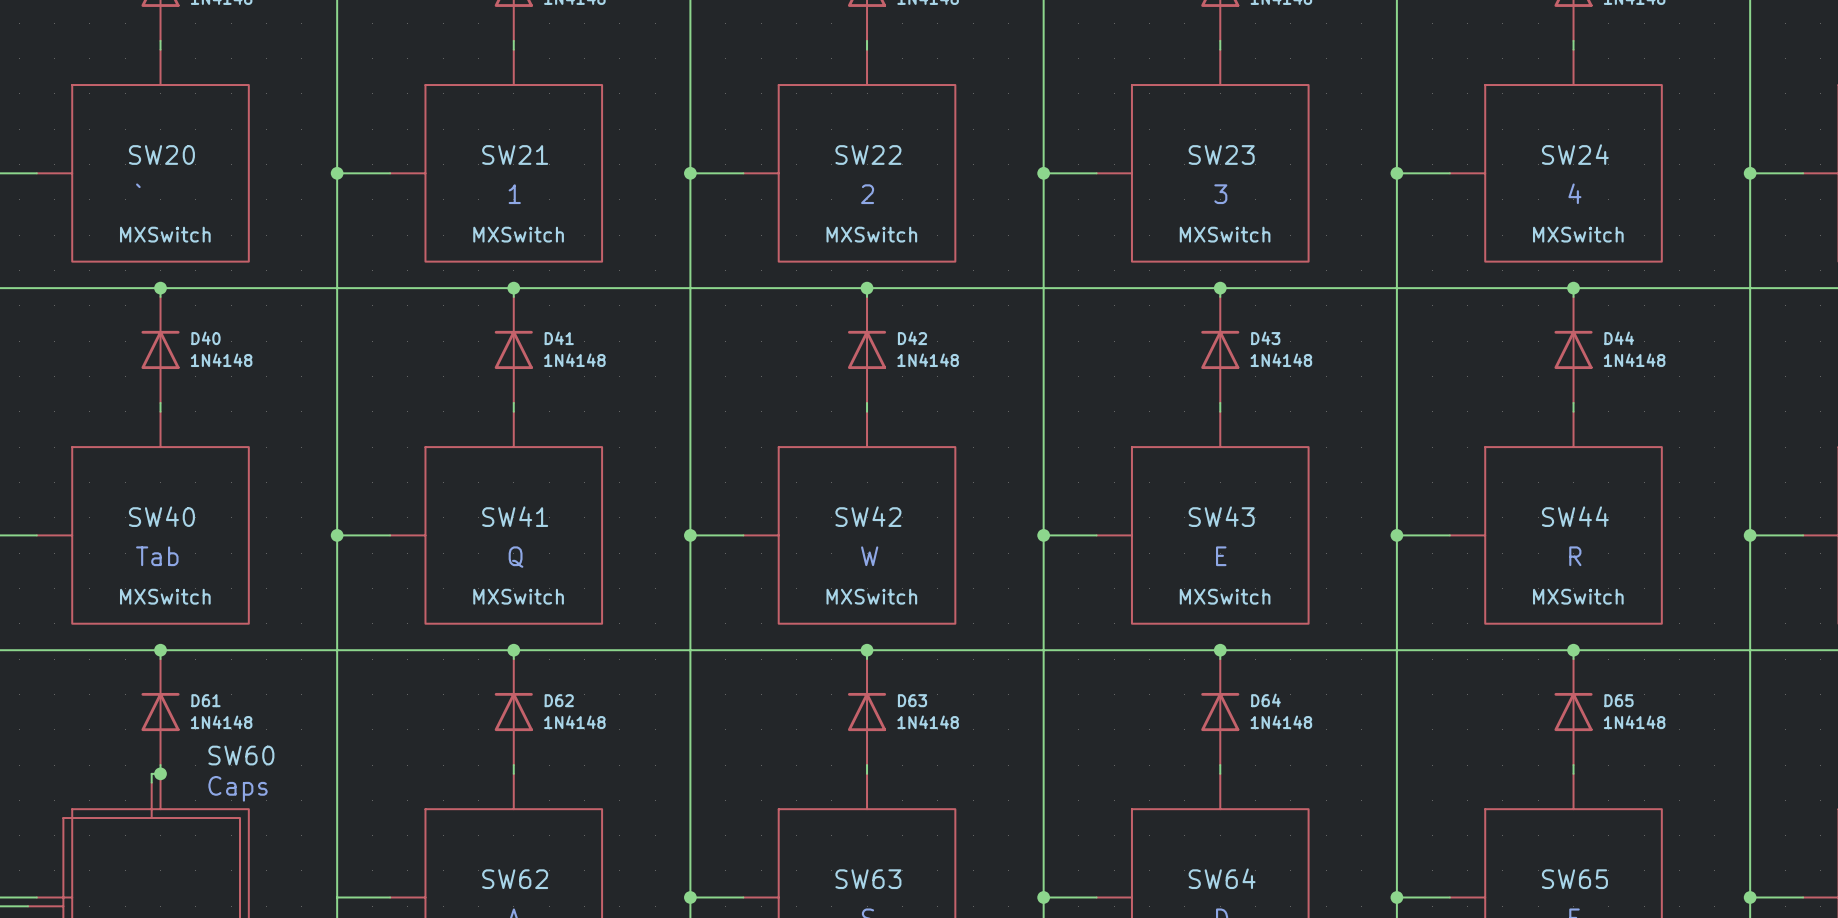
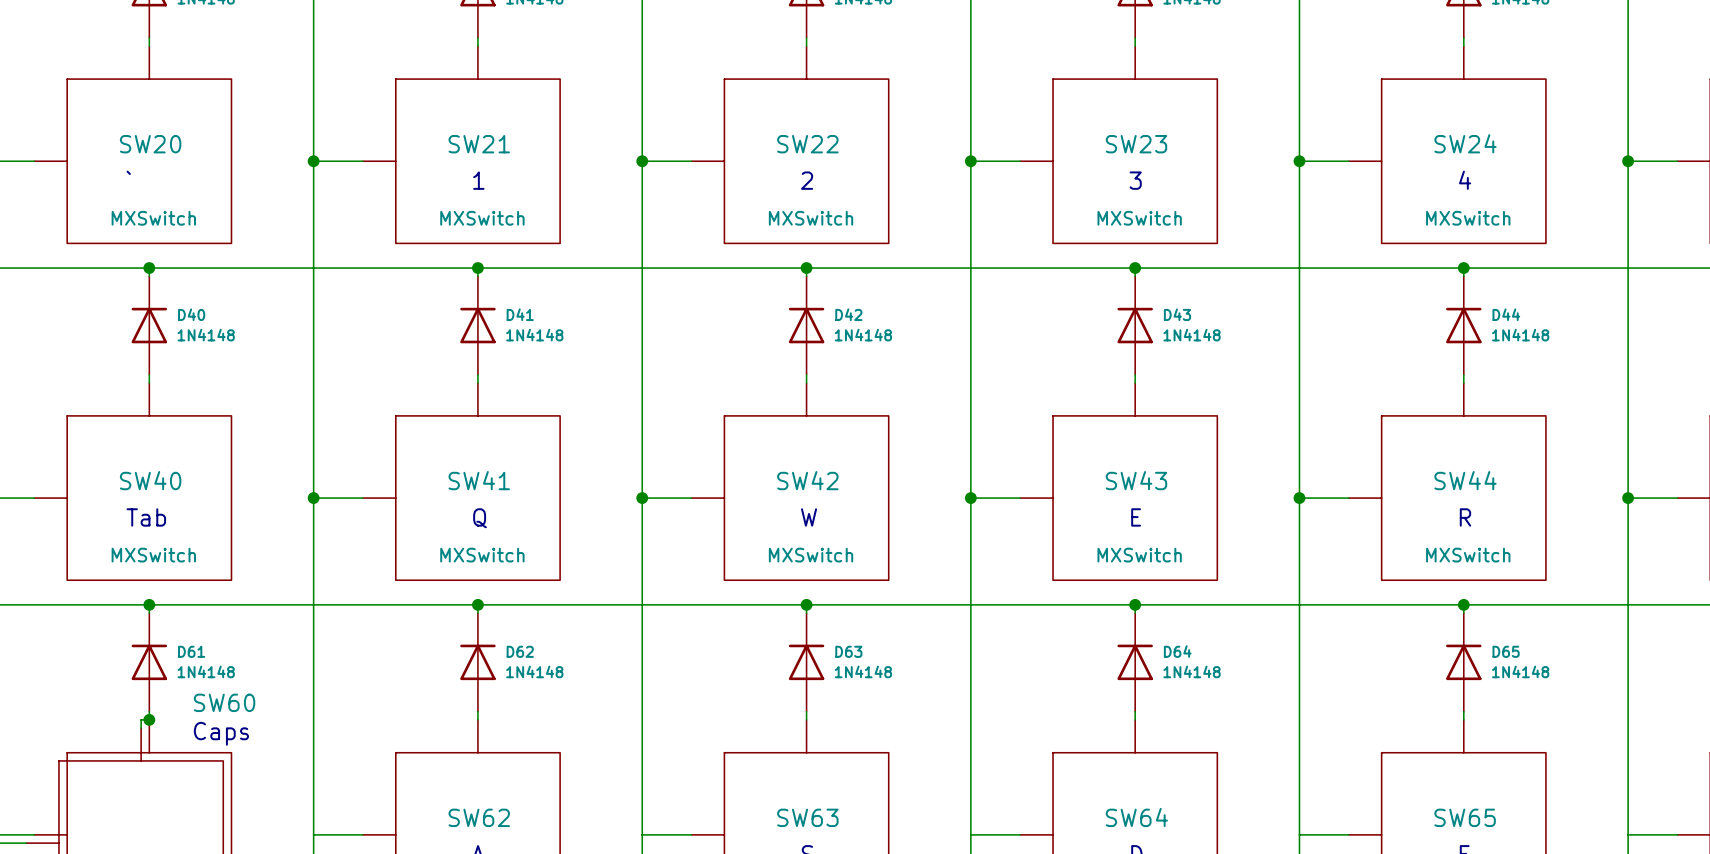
junction: (690, 897) -> none
junction: (1043, 897) -> none
junction: (1396, 897) -> none
junction: (1750, 897) -> none

